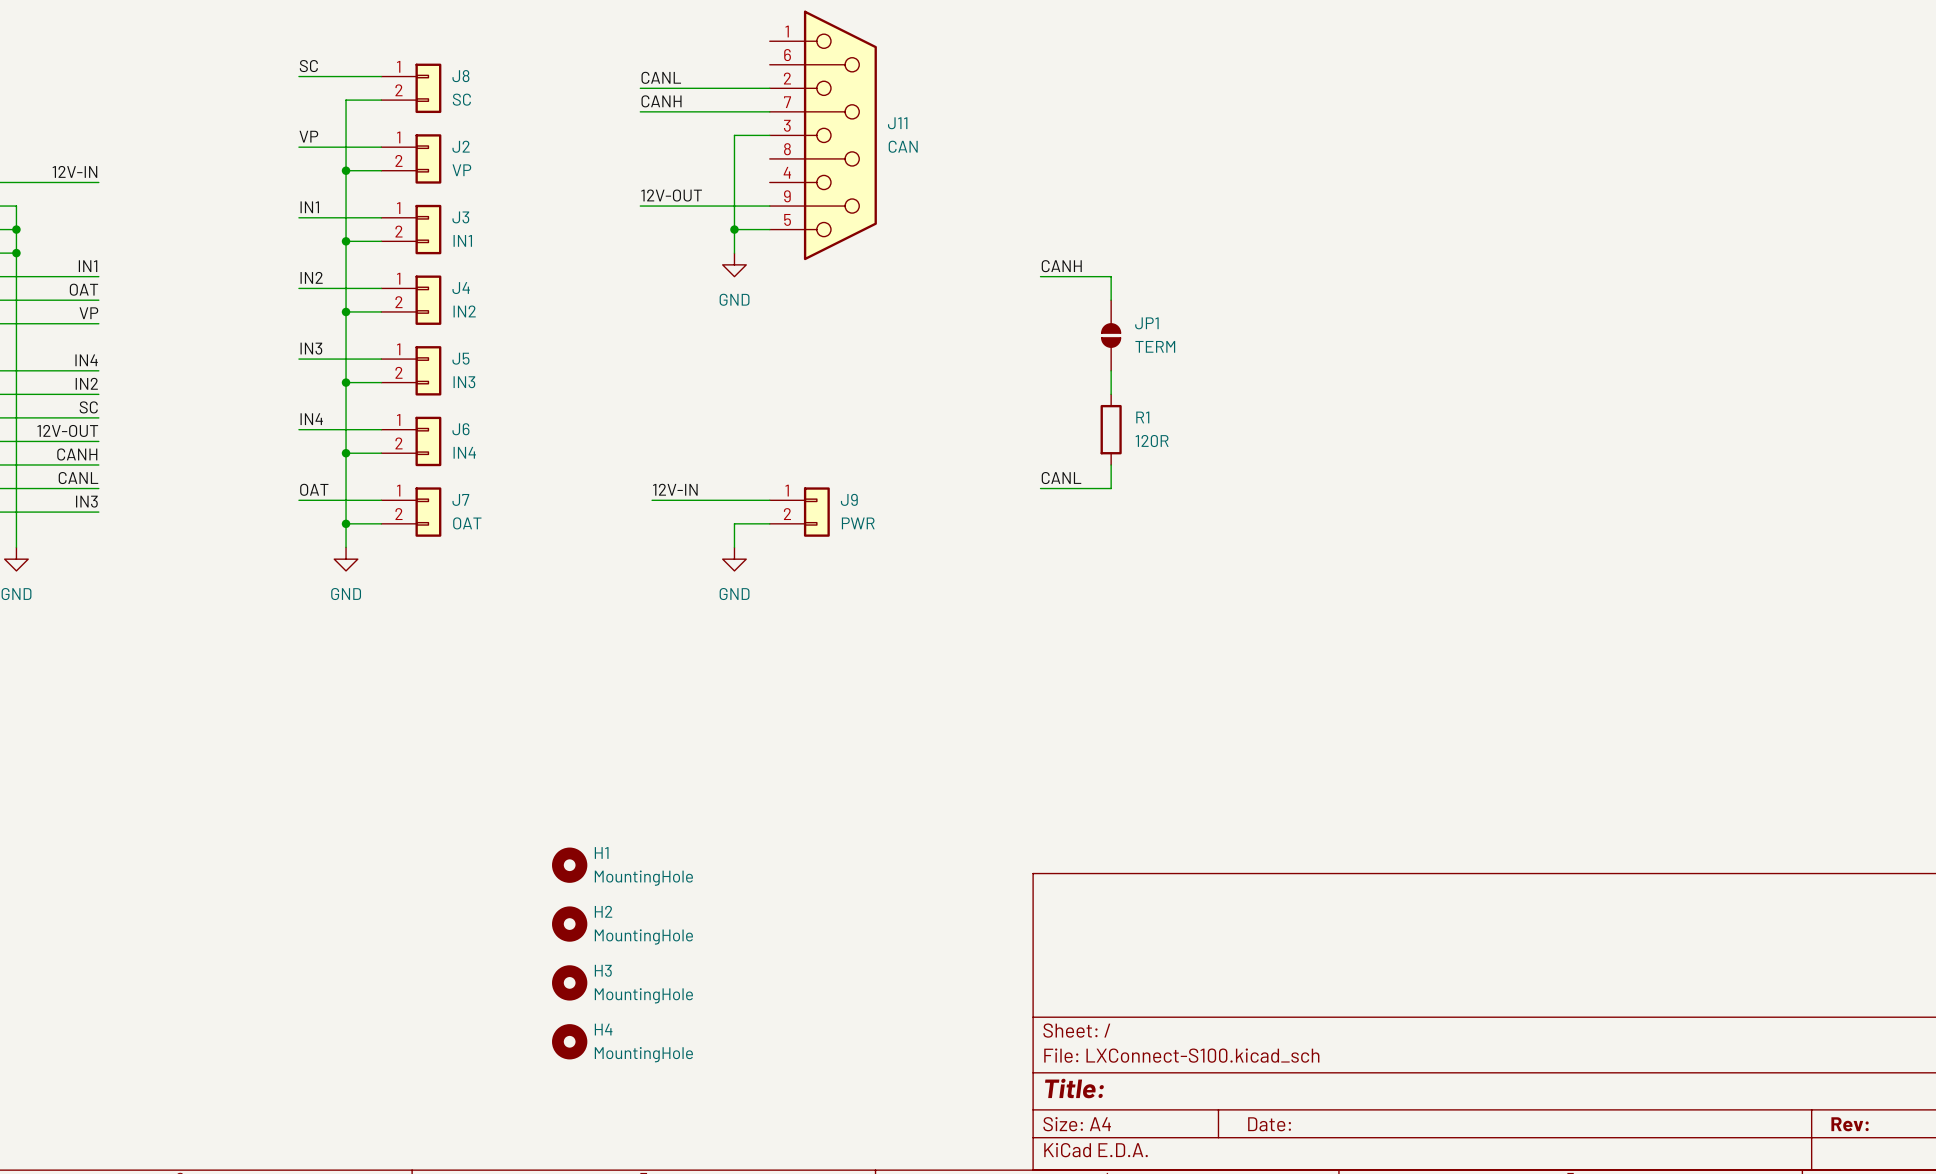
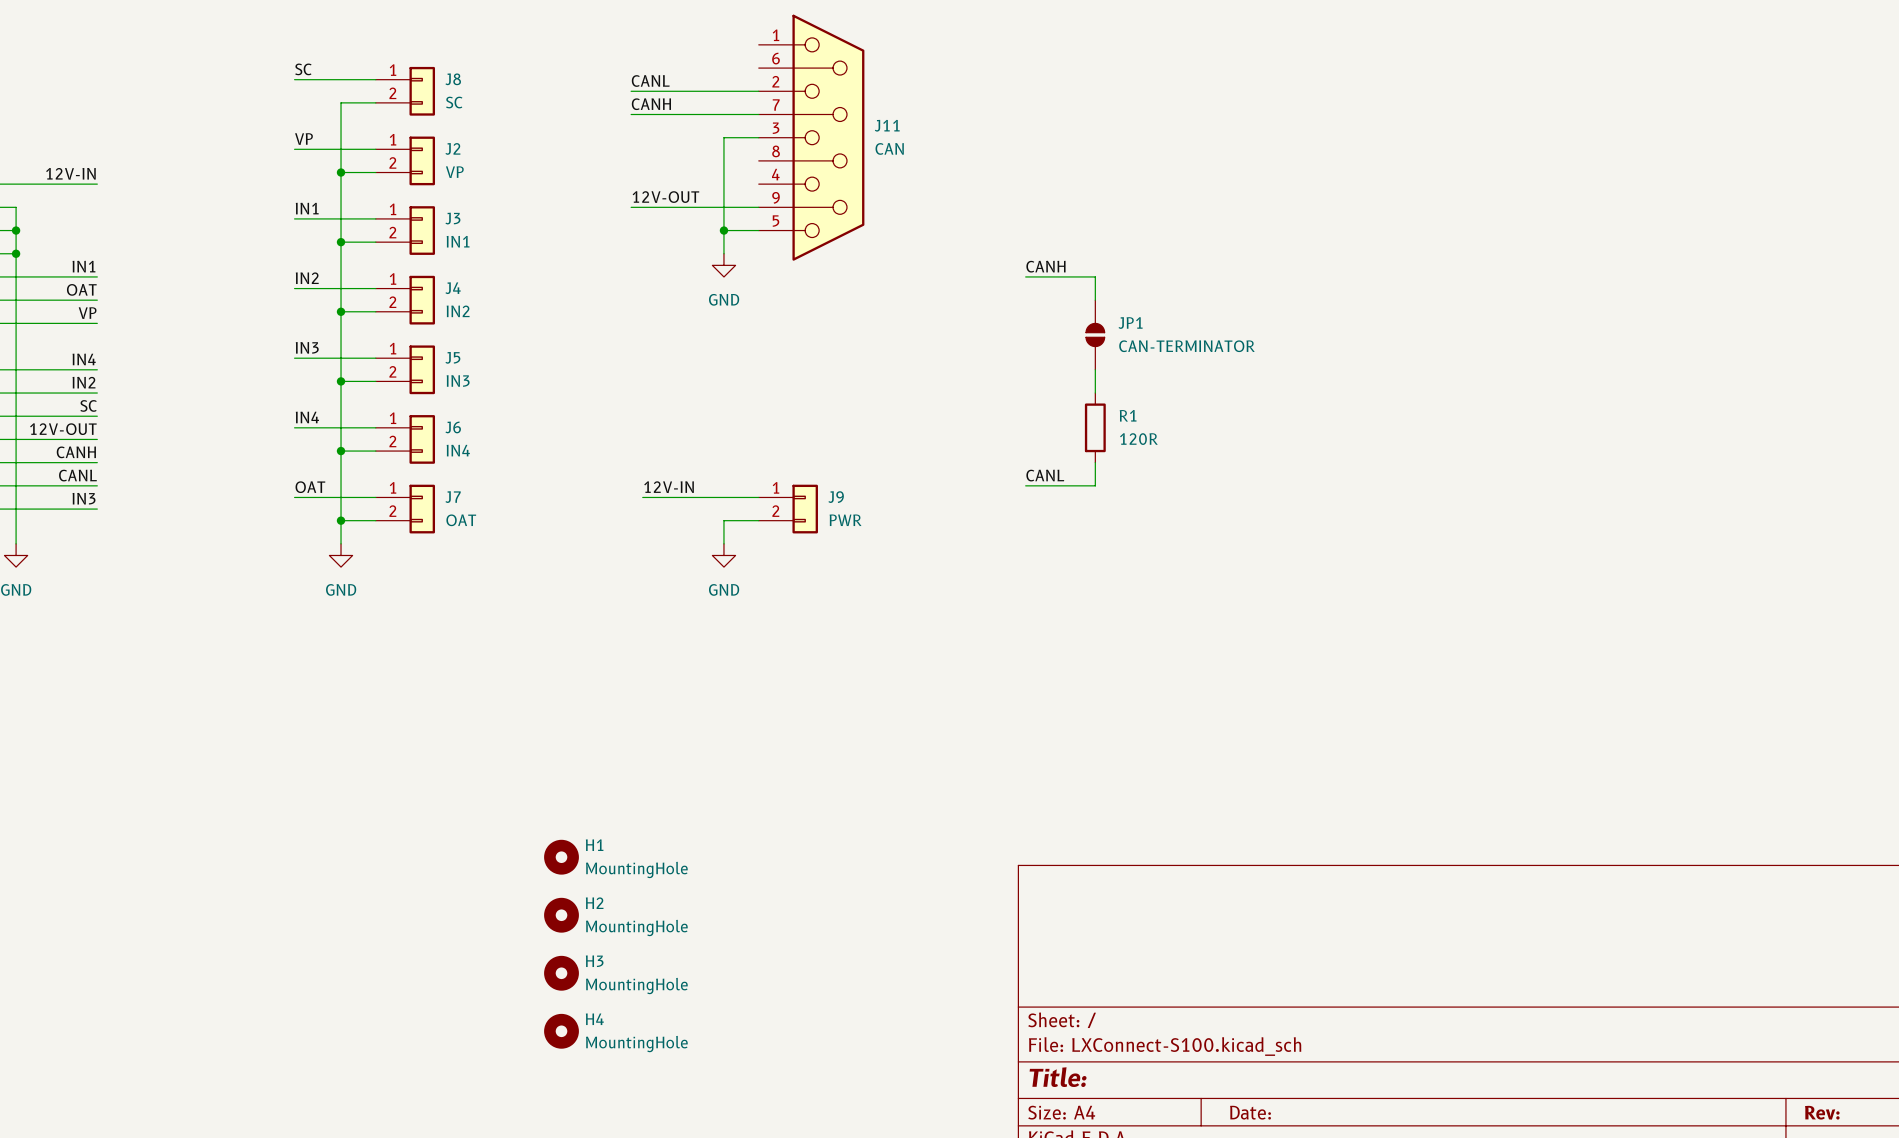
JP1 value: TERM (1155, 346) -> CAN-TERMINATOR (1186, 346)

